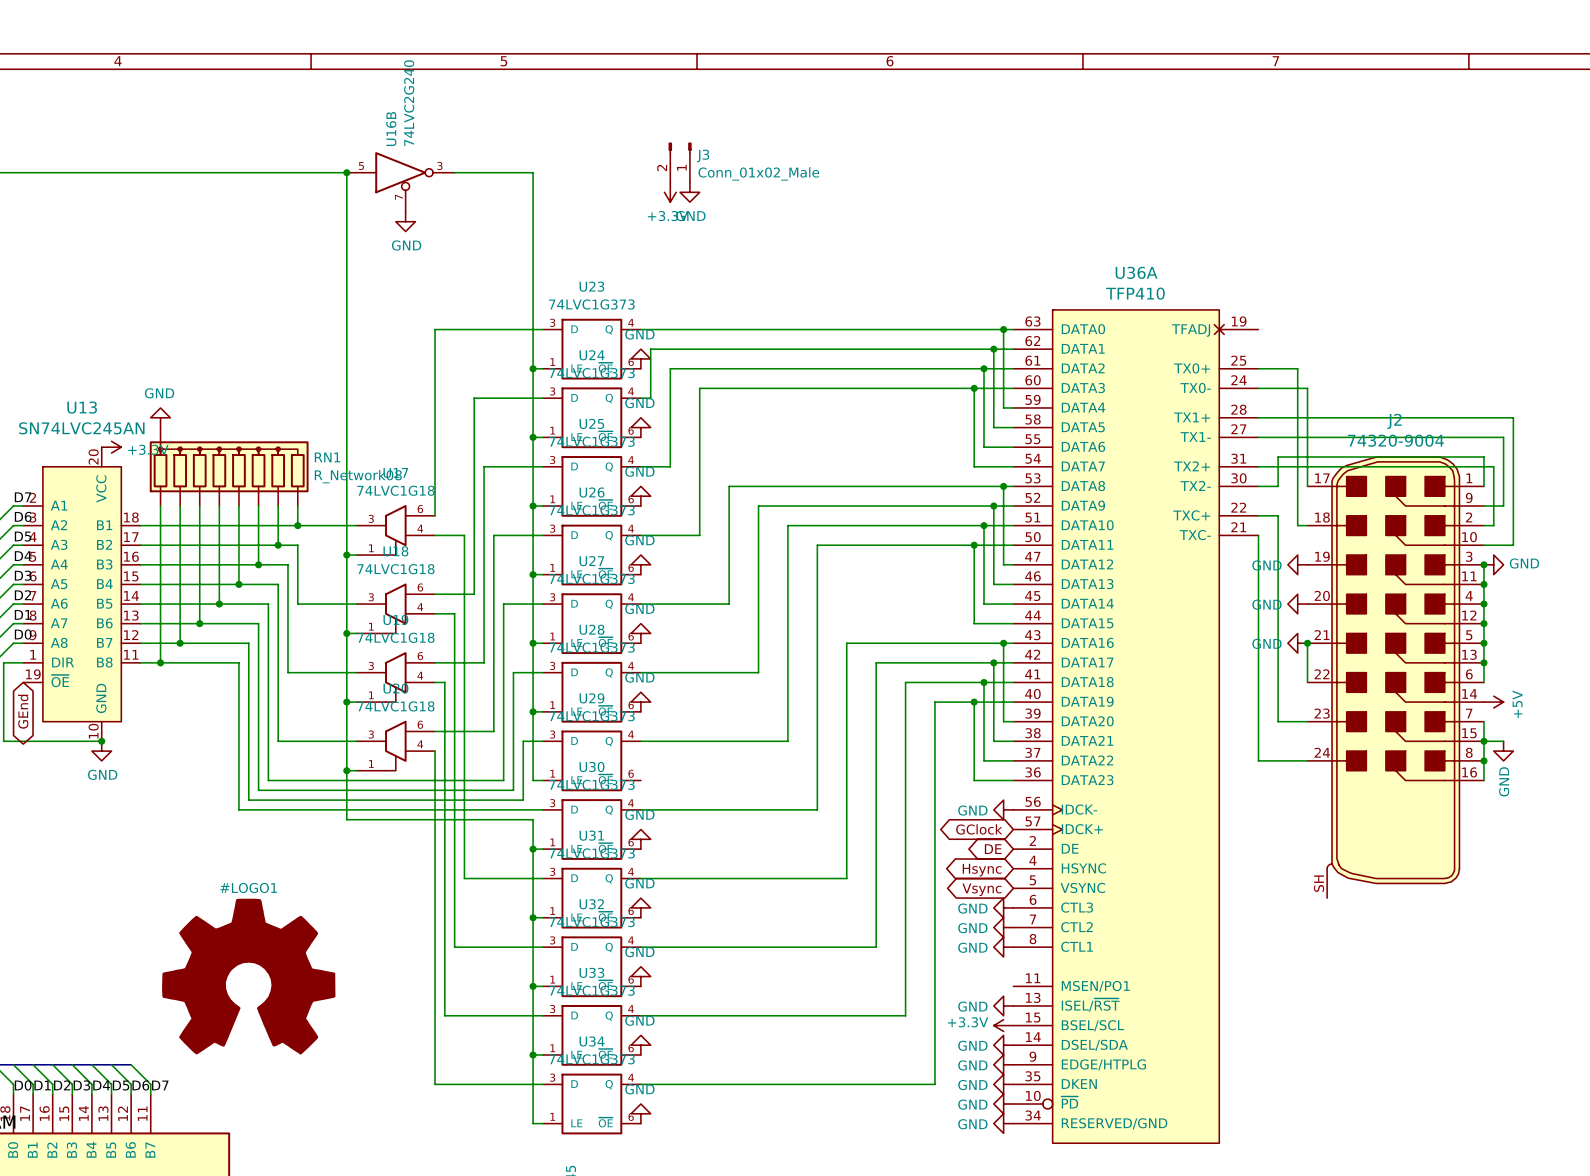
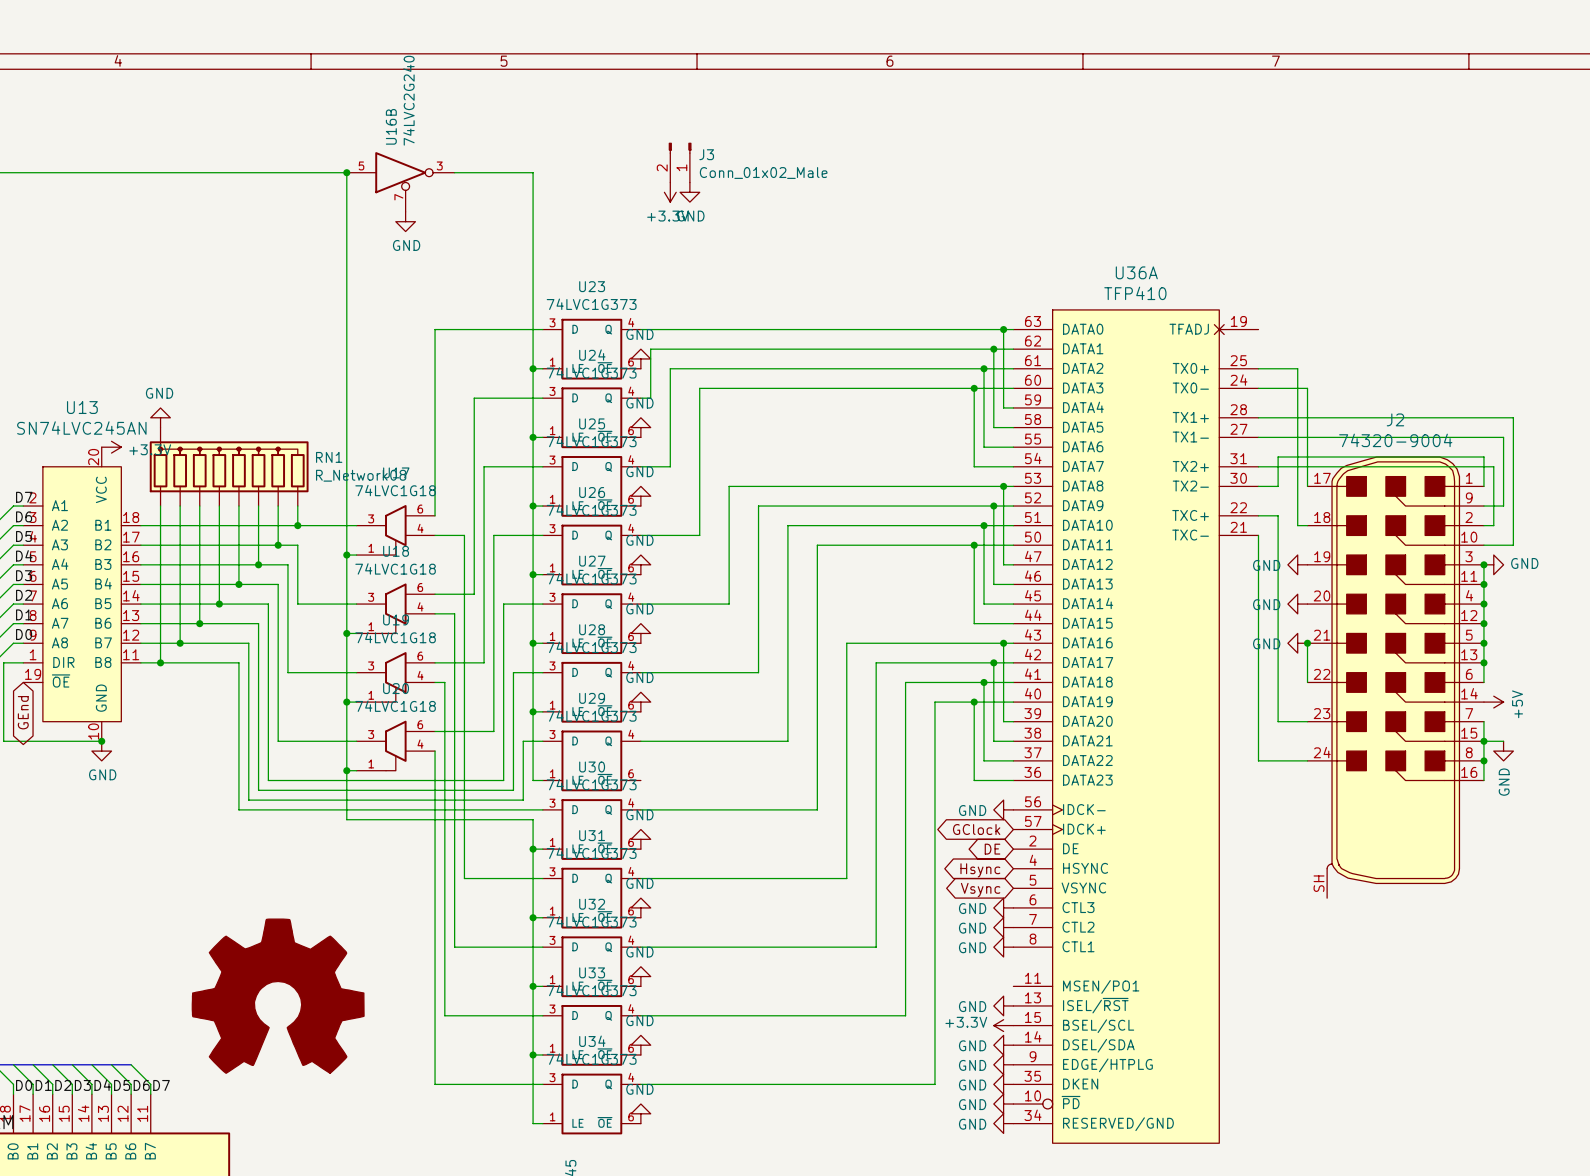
#LOGO1: (248, 976) -> none
power symbol: none -> (278, 996)

